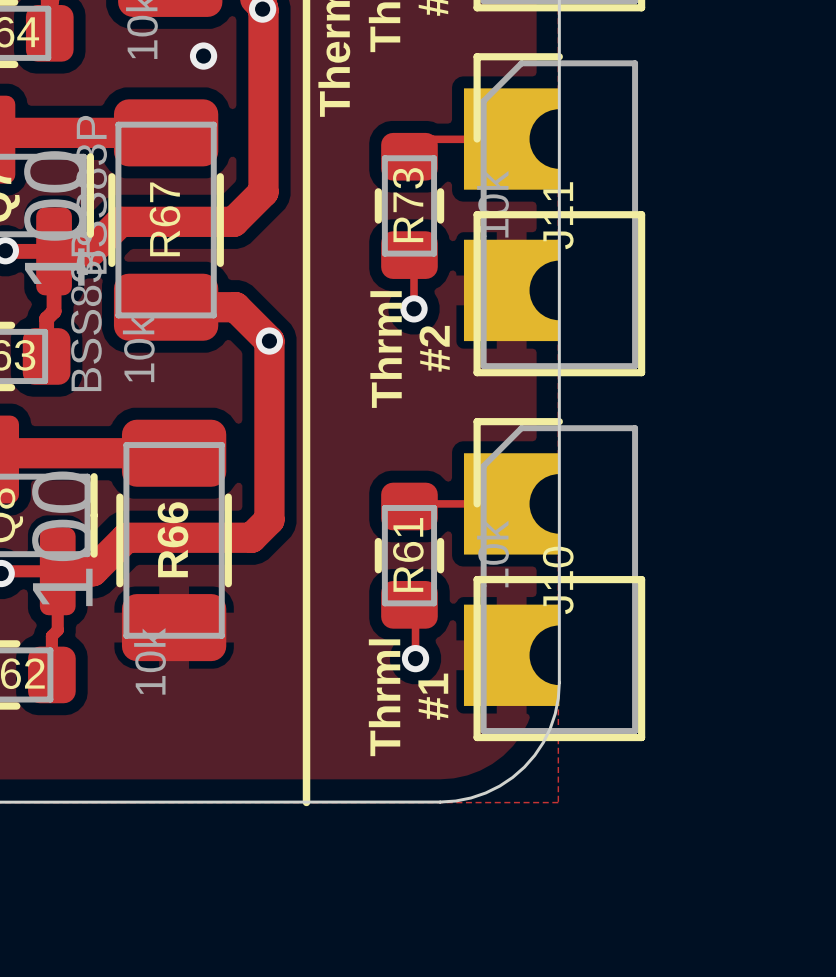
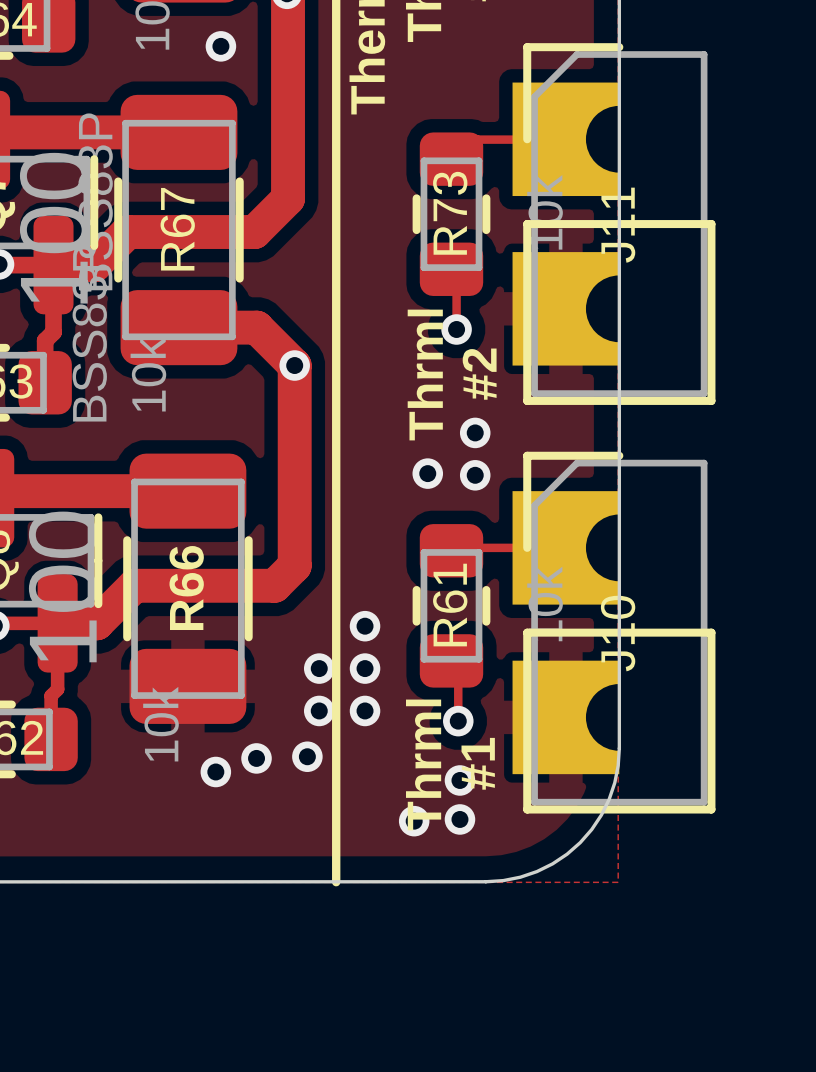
via: none -> (475, 432)
via: none -> (427, 473)
via: none -> (475, 475)
via: none -> (365, 626)
via: none -> (319, 668)
via: none -> (365, 668)
via: none -> (319, 710)
via: none -> (365, 710)
via: none -> (307, 756)
via: none -> (256, 758)
via: none -> (215, 771)
via: none -> (459, 780)
via: none -> (459, 819)
via: none -> (414, 821)

